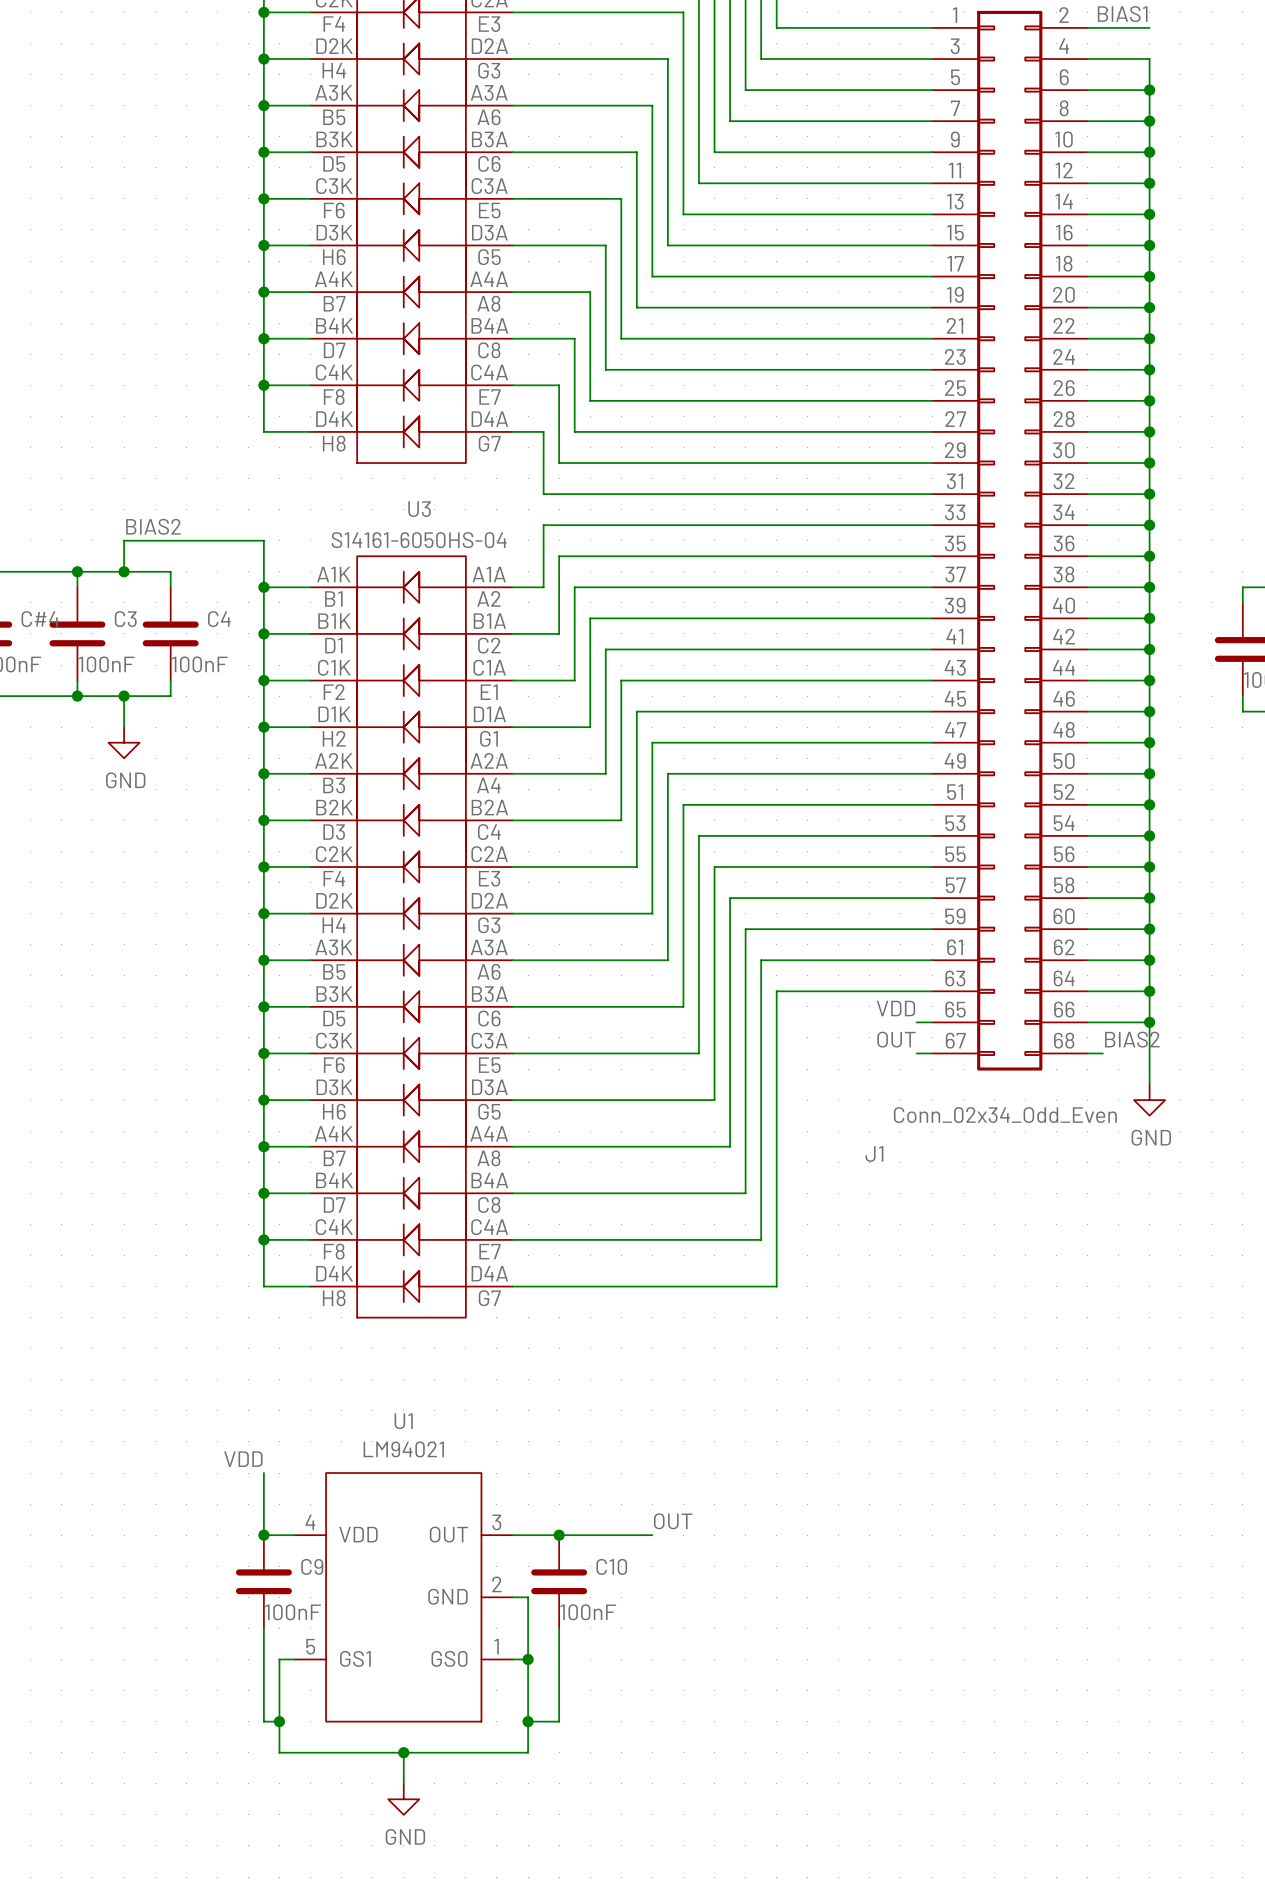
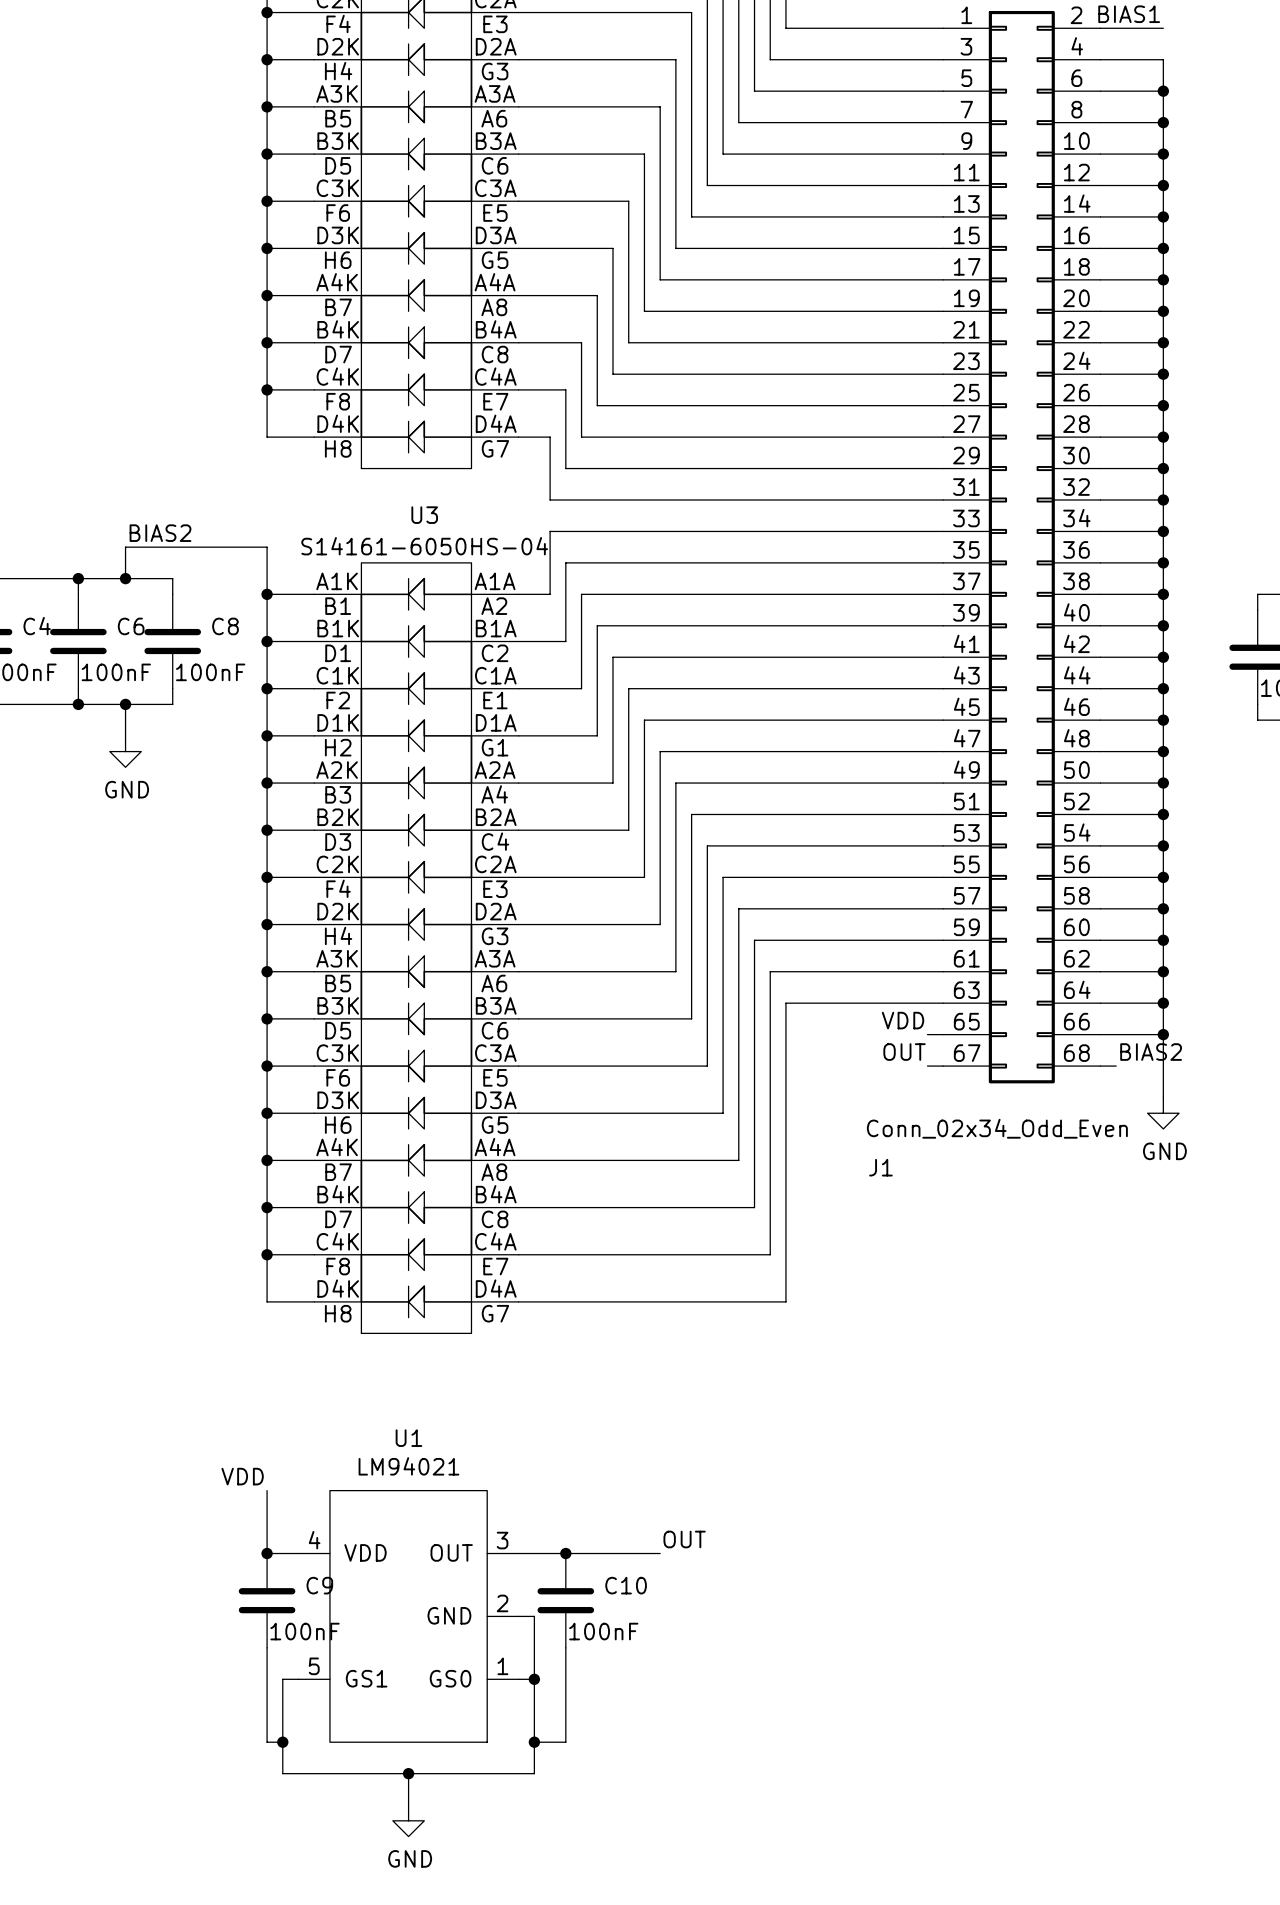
C#4 name: C#4 (40, 619) -> C4 (37, 626)
C3 name: C3 (125, 619) -> C6 (131, 626)
C4 name: C4 (219, 619) -> C8 (225, 626)

